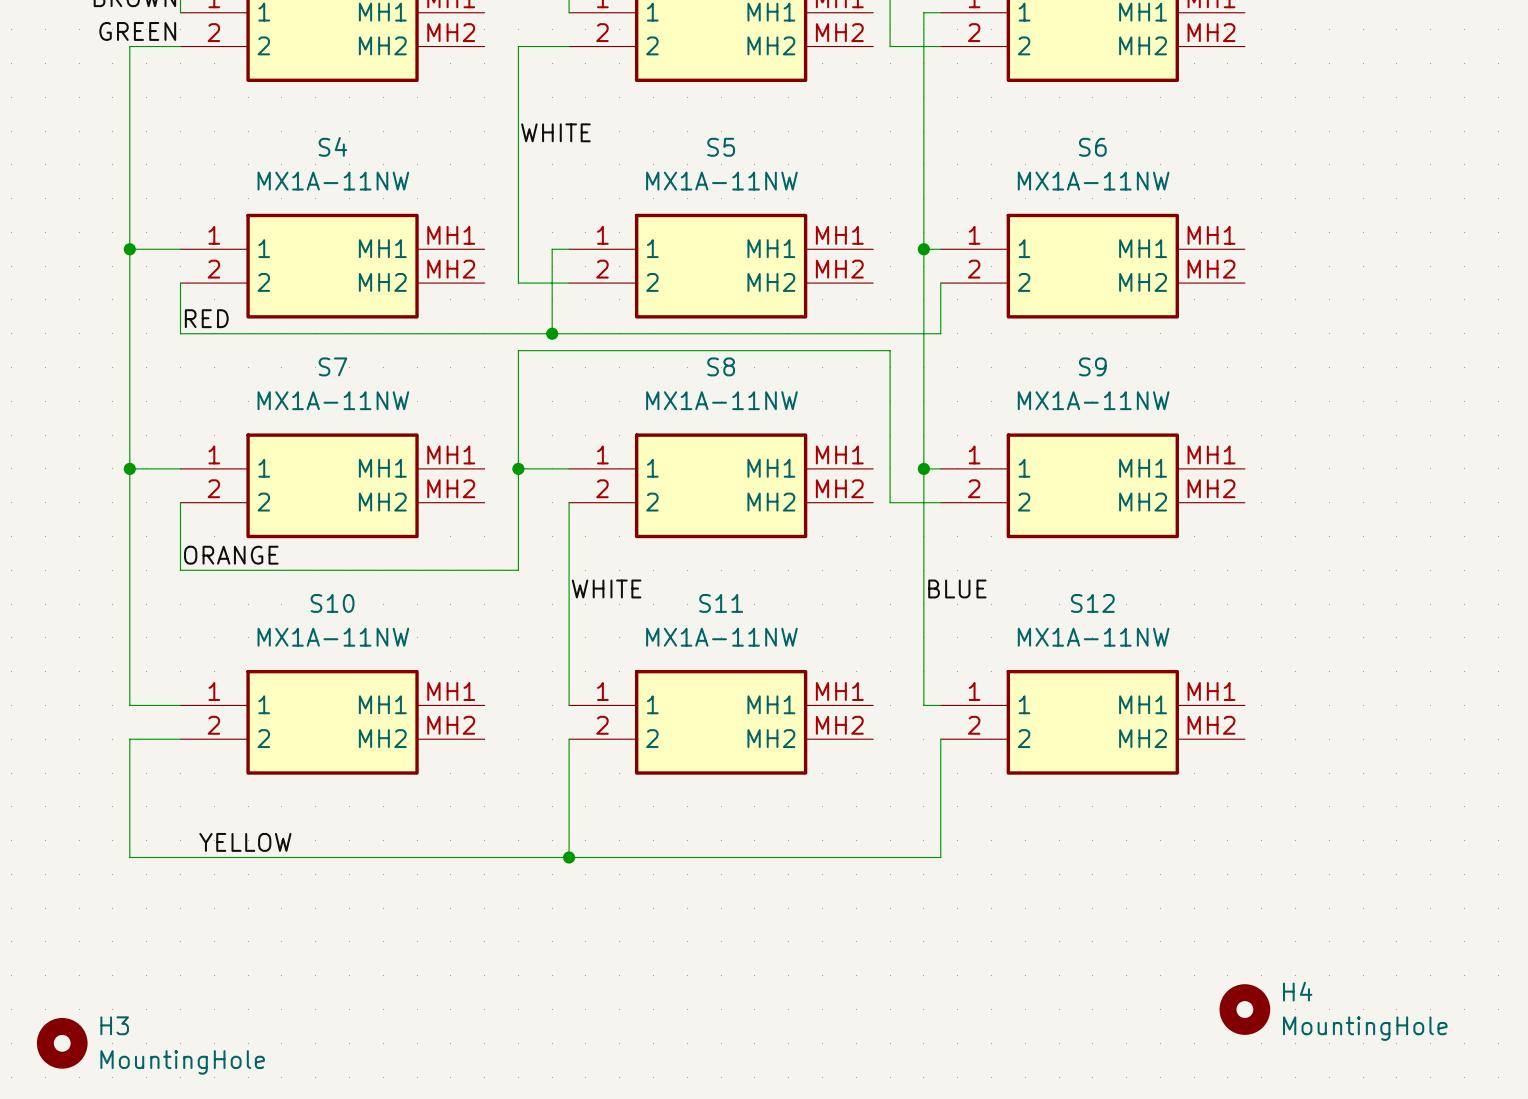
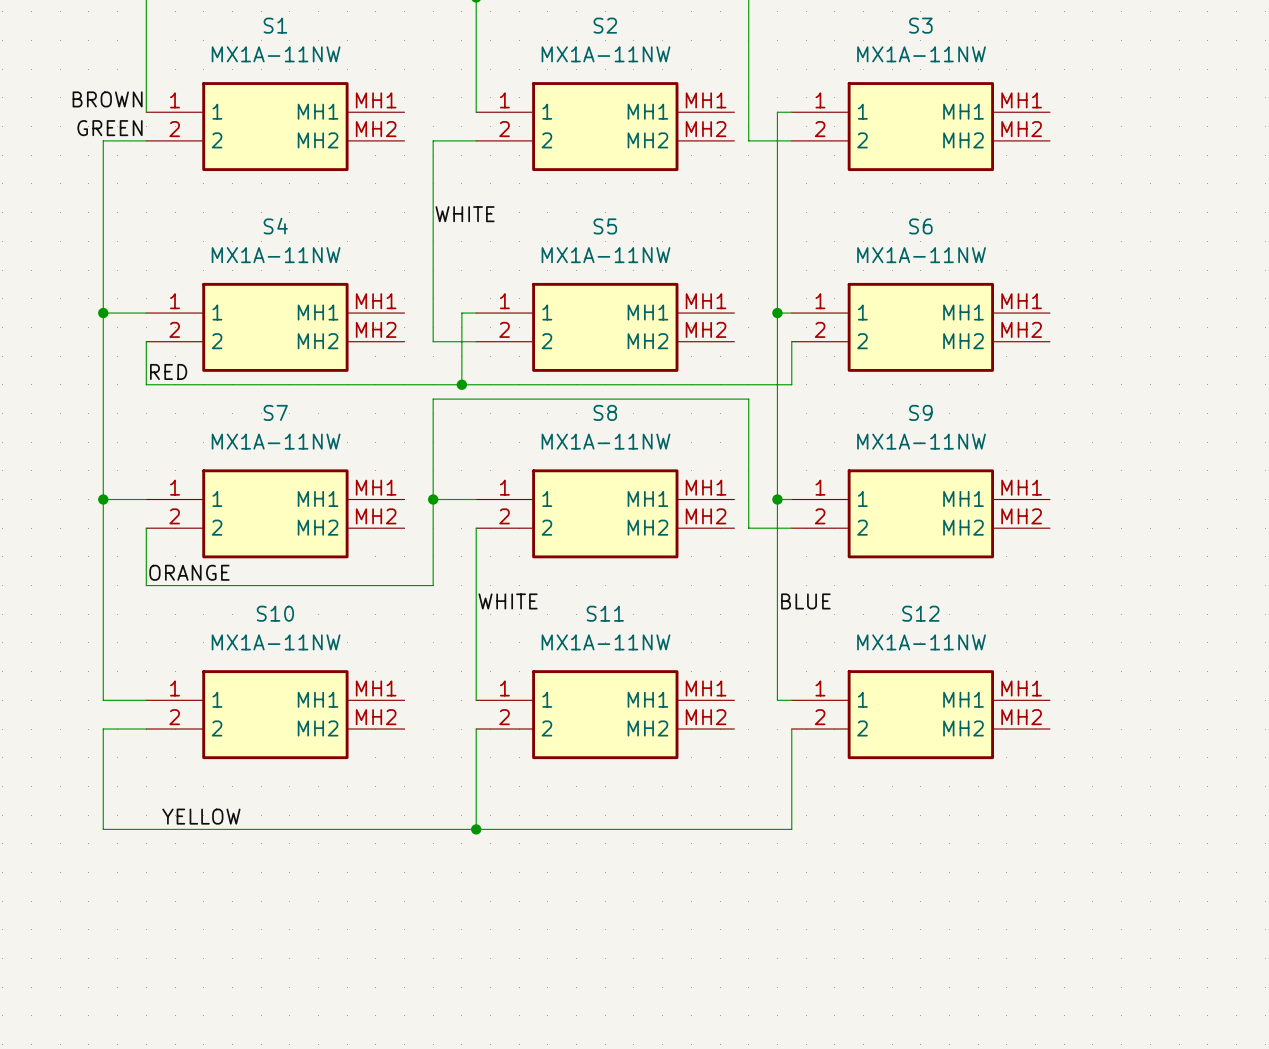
H4: MountingHole (1244, 1009) -> none
H3: MountingHole (62, 1043) -> none

